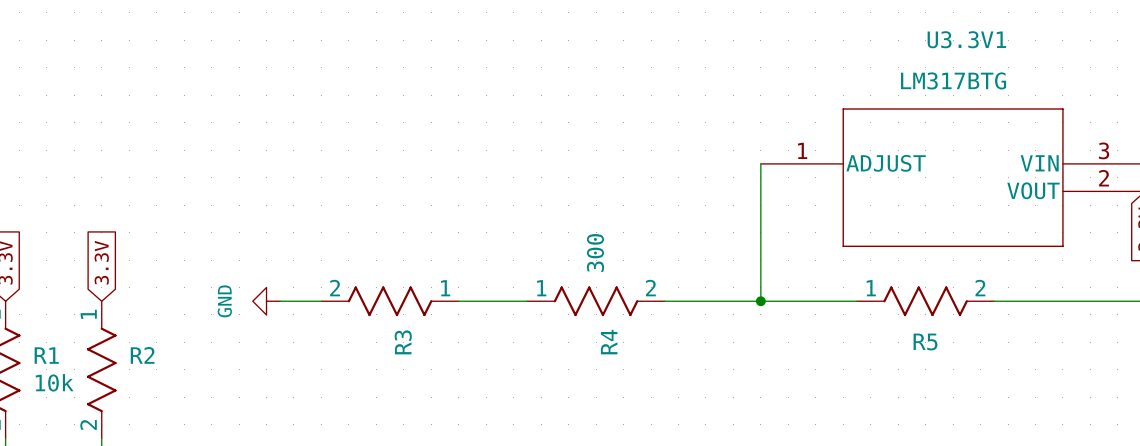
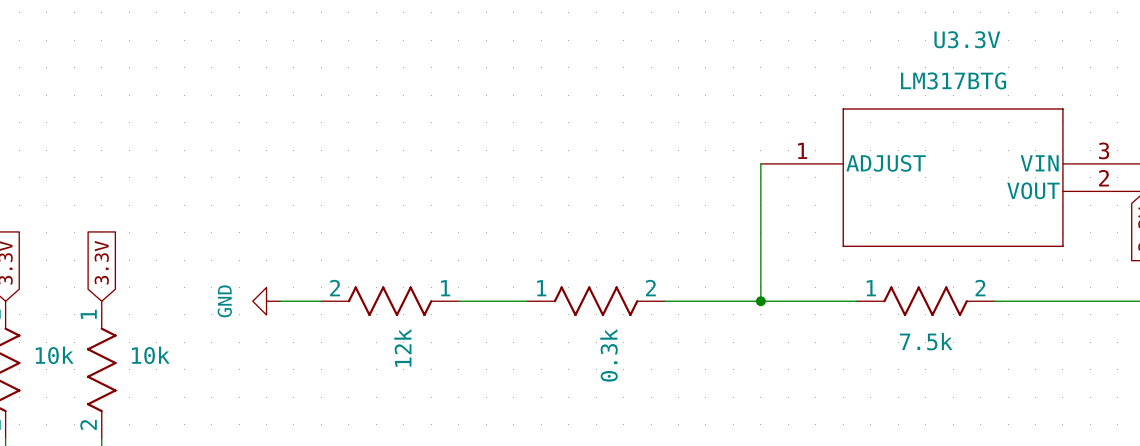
U3.3V1 name: U3.3V1 (966, 39) -> U3.3V (967, 39)
R4 value: 300 (595, 252) -> none
R5 name: R5 (925, 341) -> 7.5k (926, 341)
R3 name: R3 (403, 342) -> 12k (402, 347)
R4 name: R4 (609, 342) -> 0.3k (609, 355)
R1 name: R1 (46, 355) -> 10k (54, 355)
R2 name: R2 (142, 355) -> 10k (150, 355)
R1 value: 10k (54, 382) -> none

